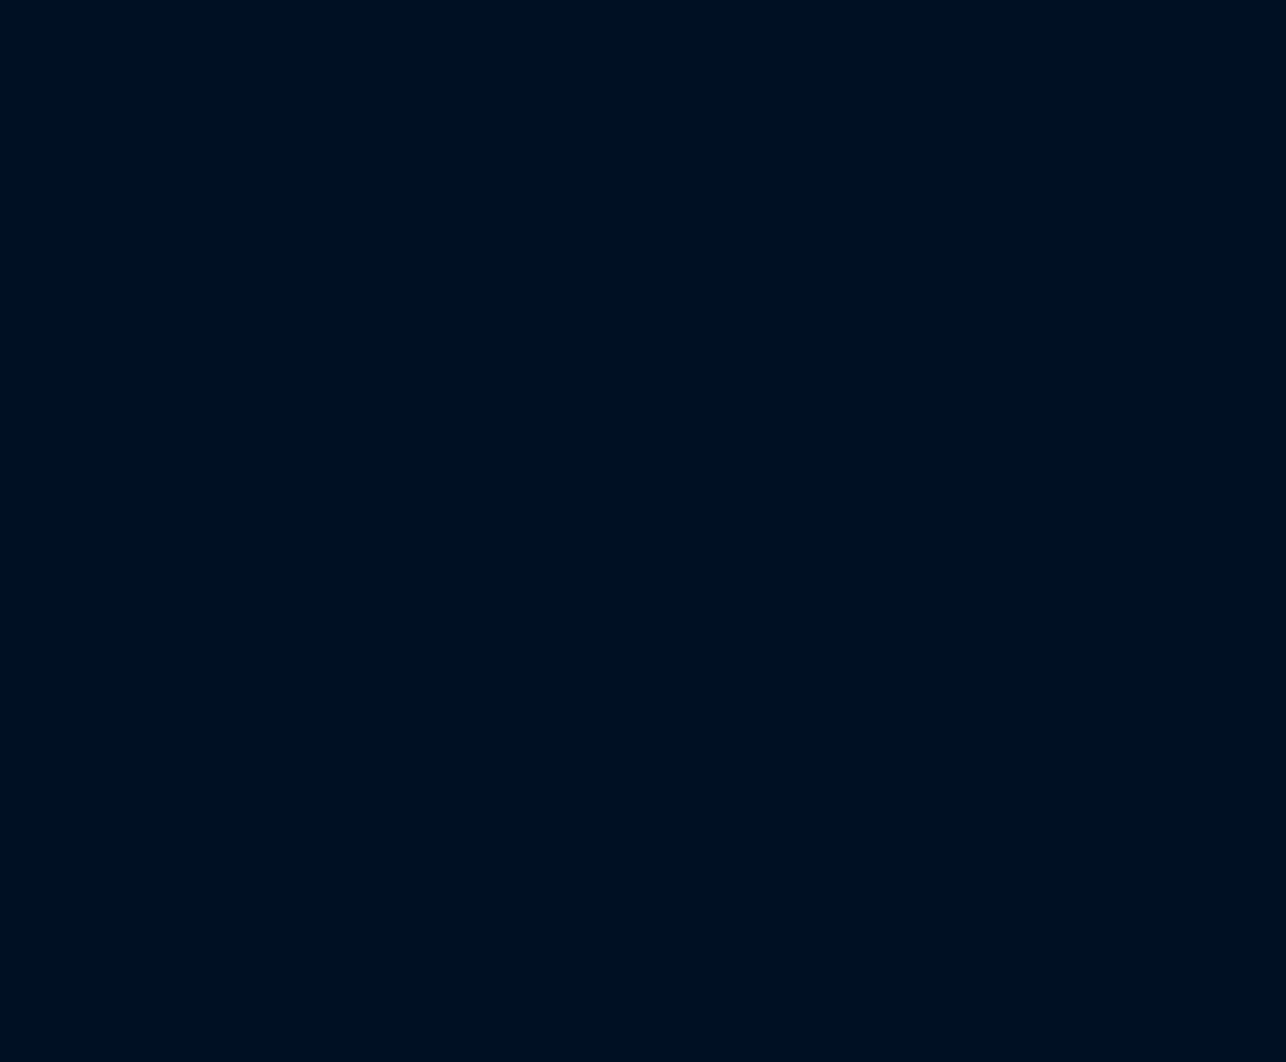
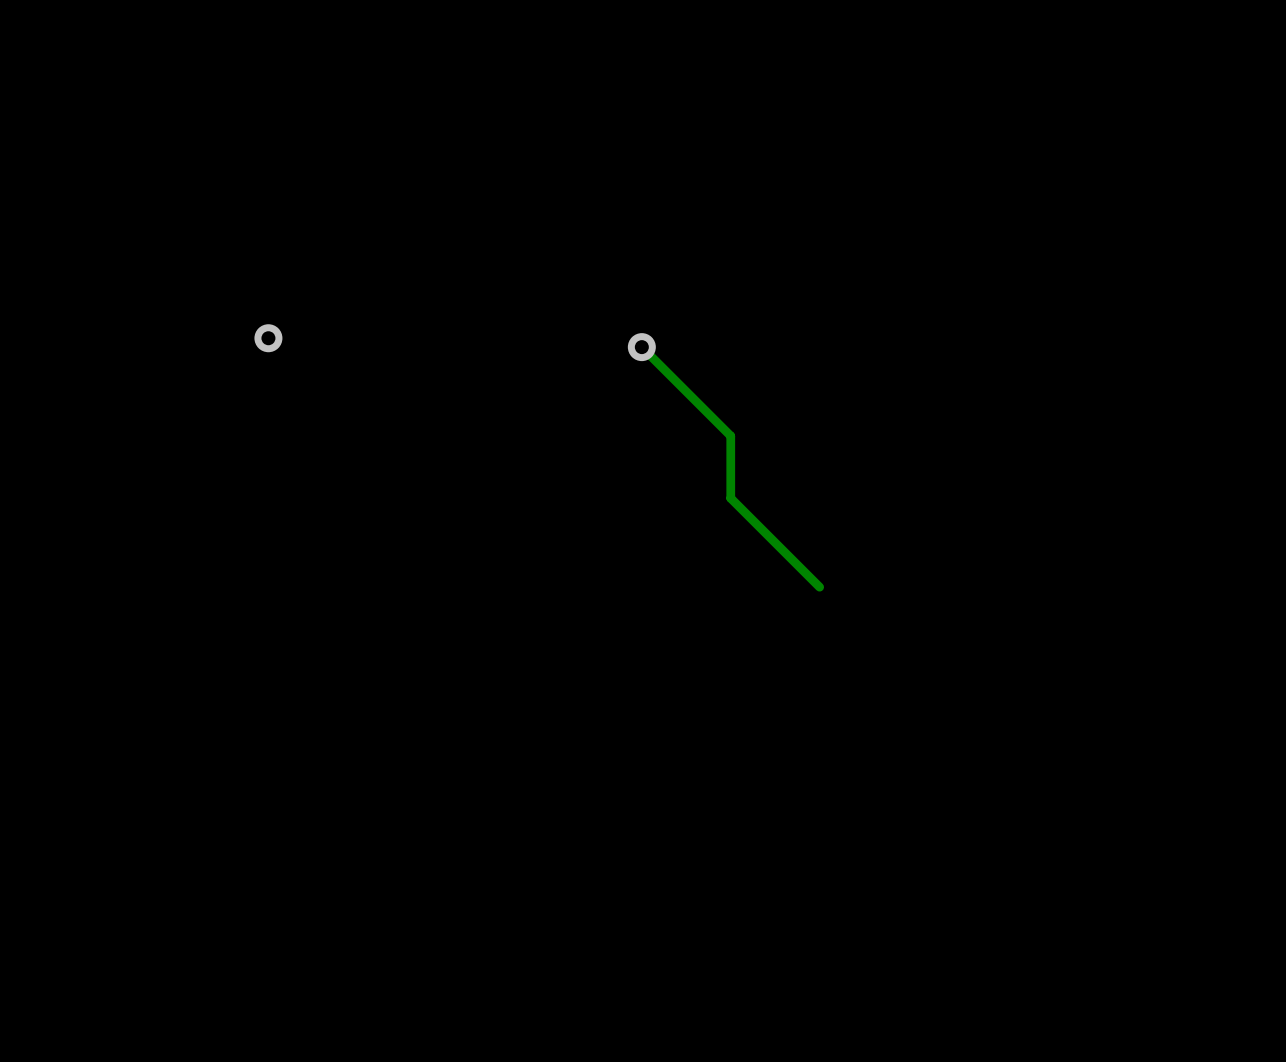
via: none -> (268, 338)
track: none -> (641, 347) (730, 436) (730, 498) (819, 587)
via: none -> (641, 347)

